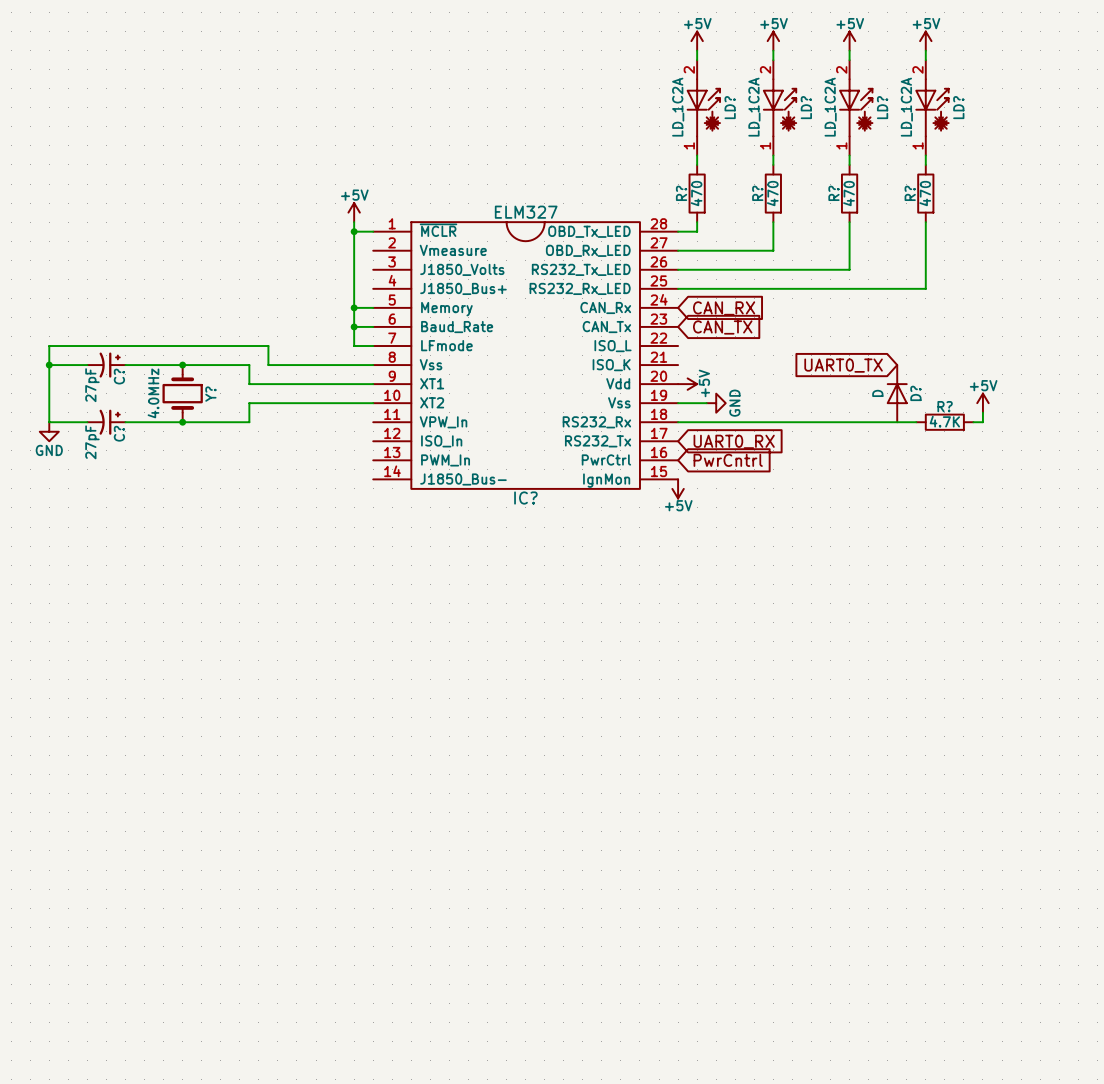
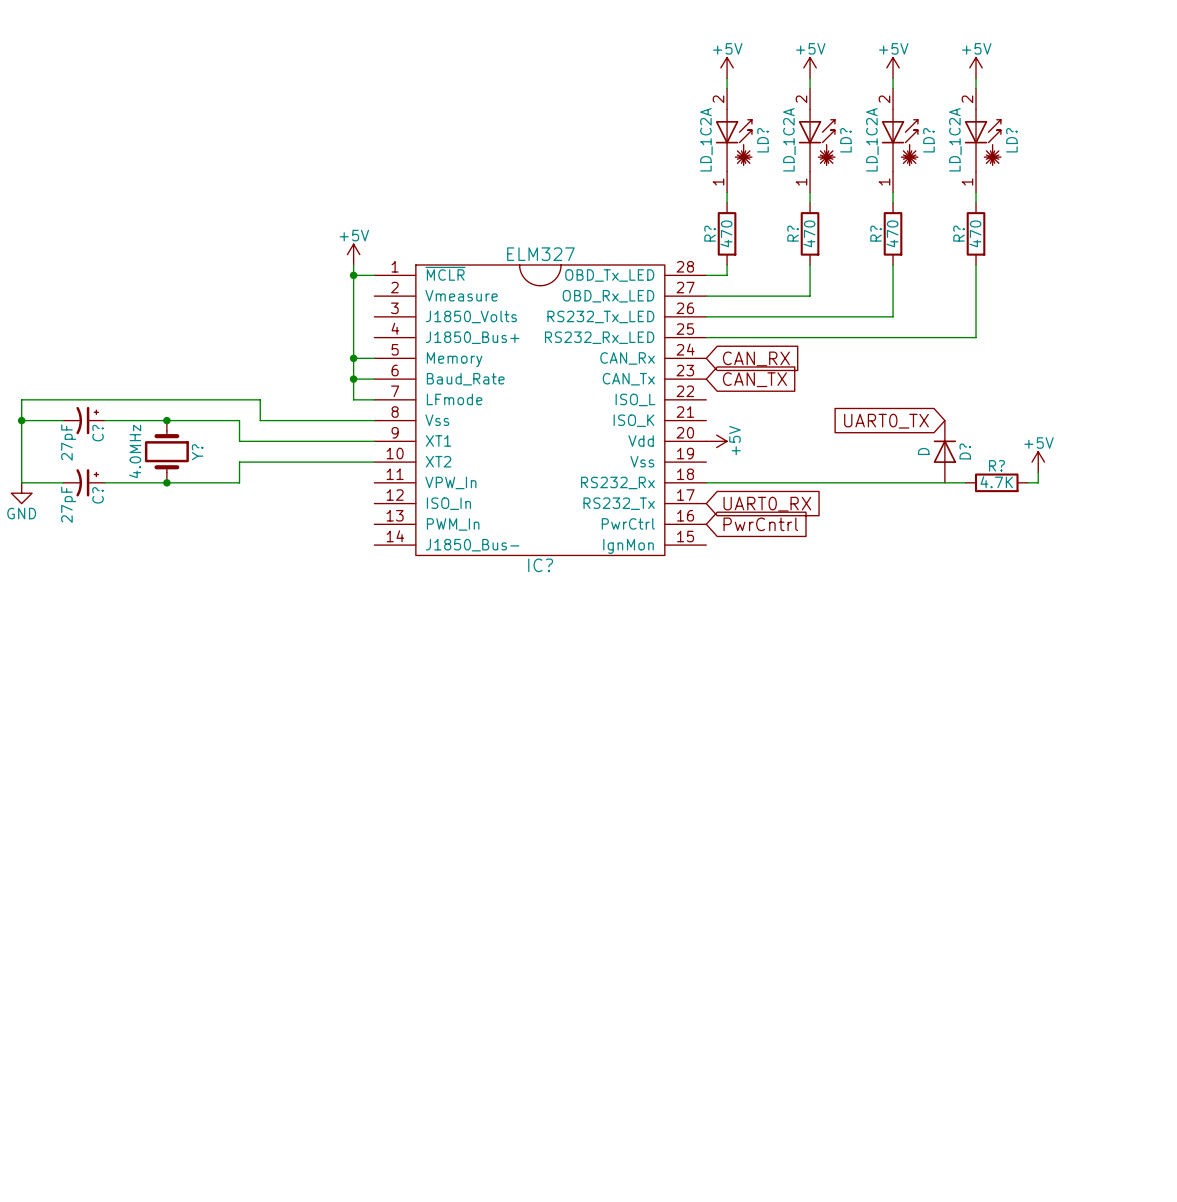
wire: (678, 403) (706, 403) -> none
power symbol: GND (716, 403) -> none
power symbol: +5V (678, 488) -> none

